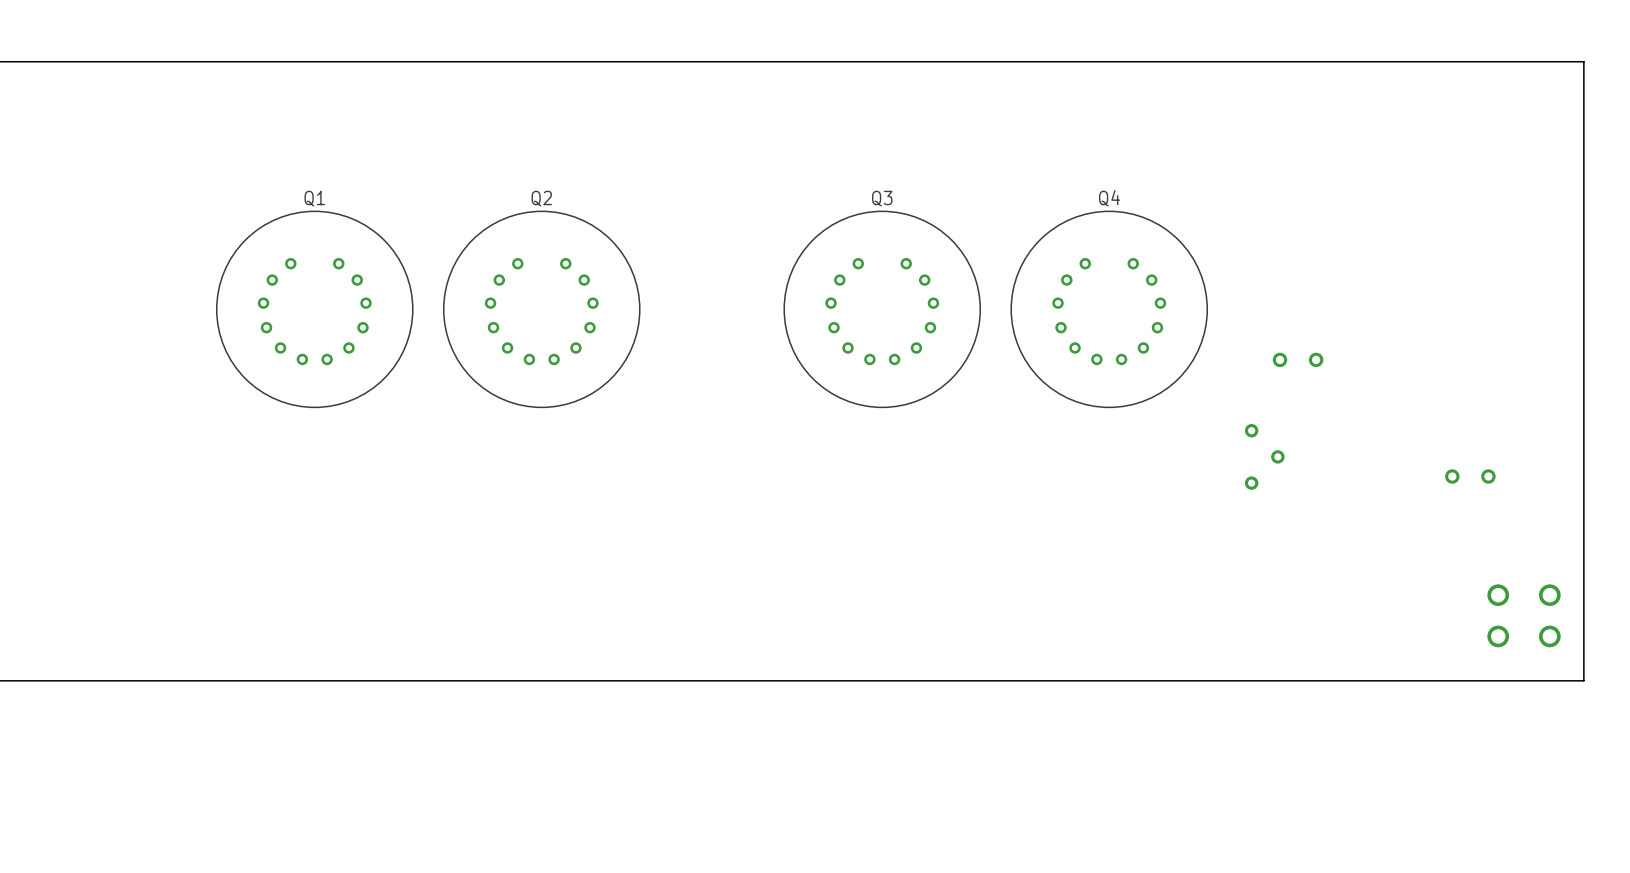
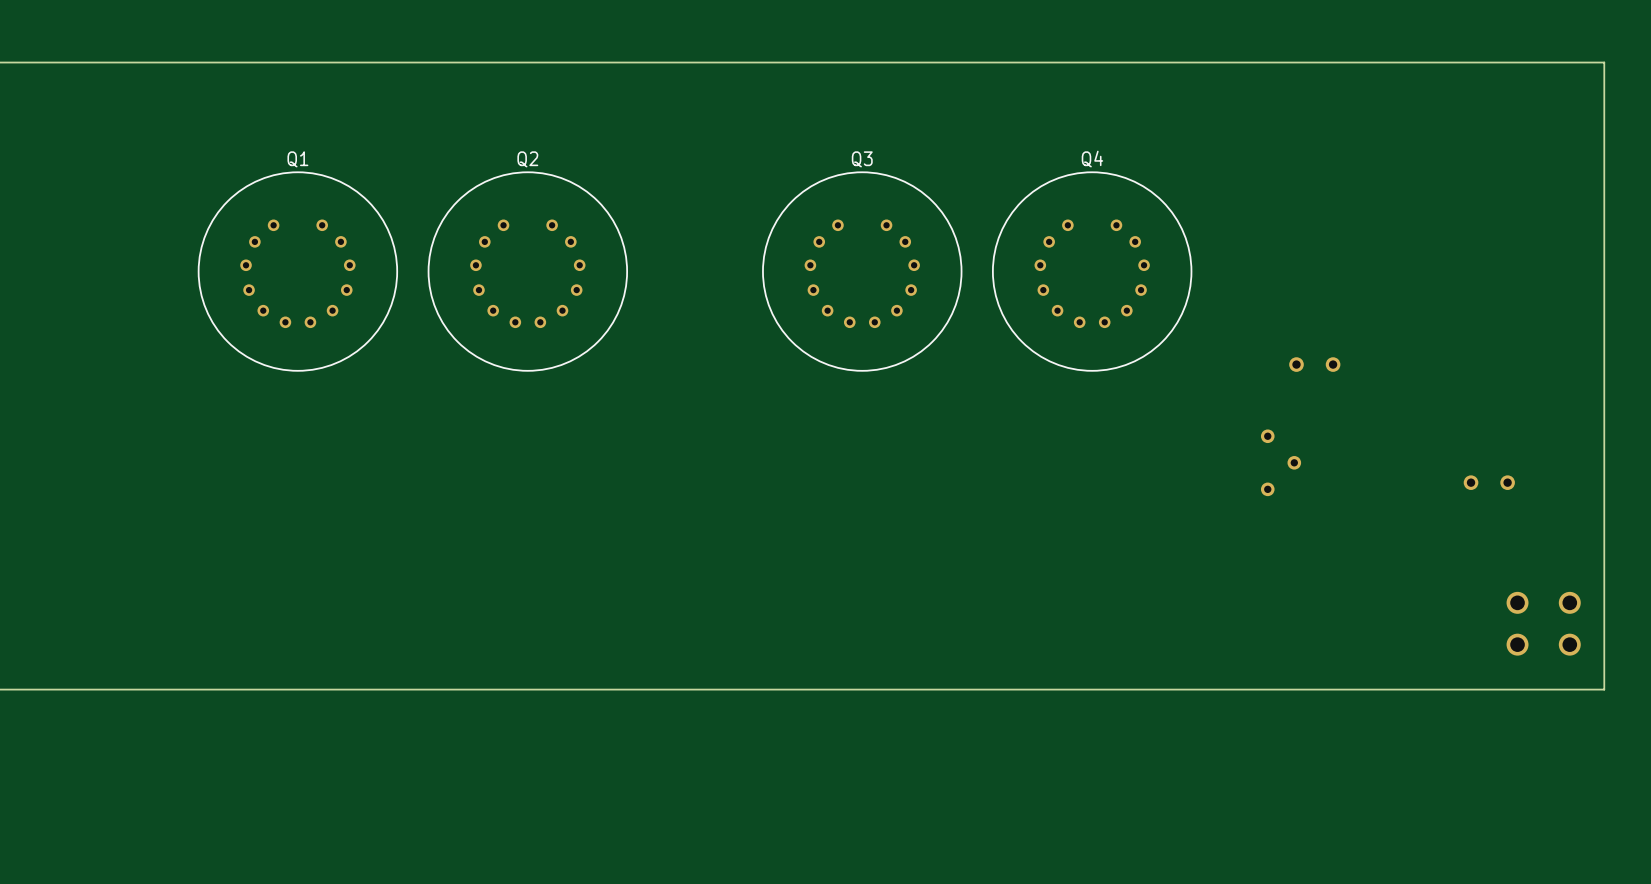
Q1 side: top (314, 309) -> bottom (297, 271)
Q2 side: top (541, 309) -> bottom (527, 271)
Q3 side: top (882, 309) -> bottom (862, 271)
Q4 side: top (1109, 309) -> bottom (1092, 271)

